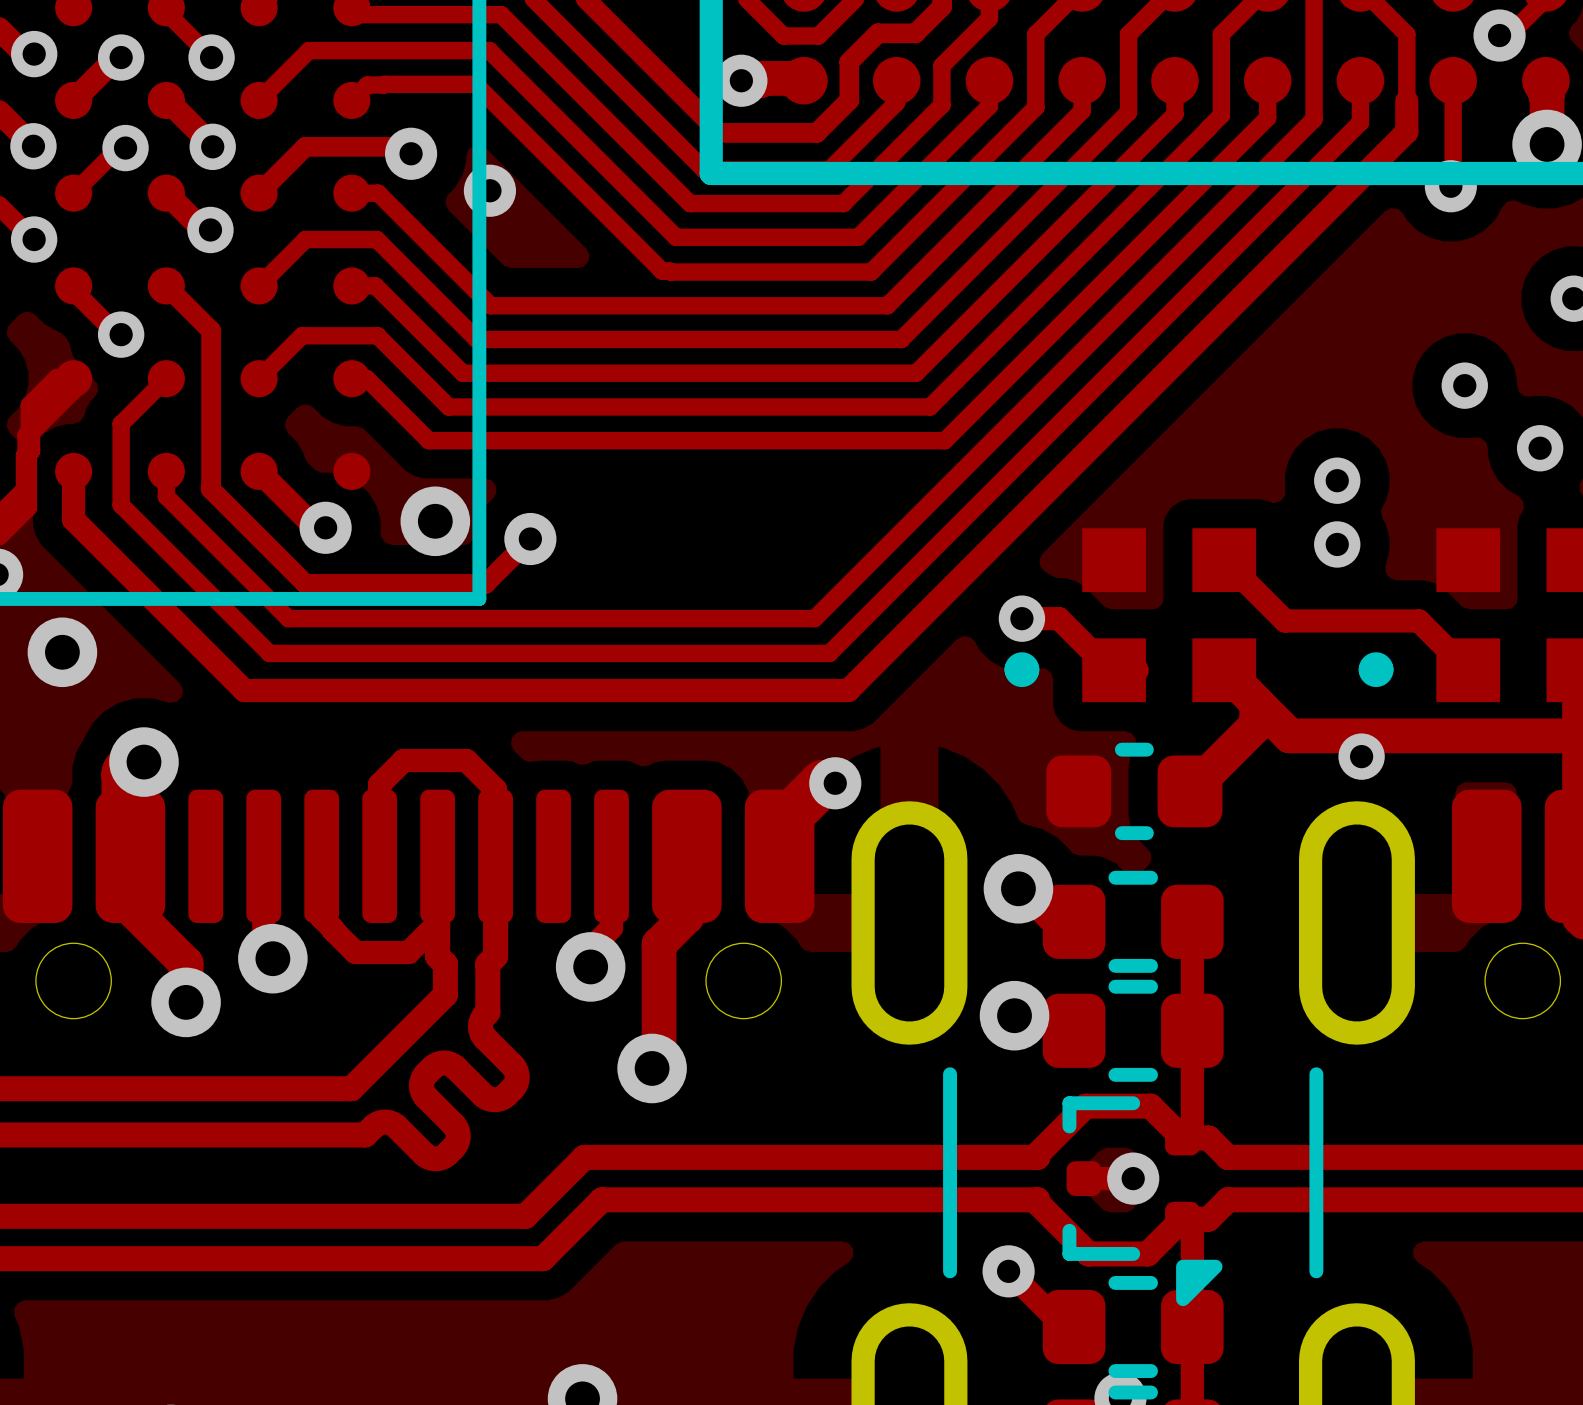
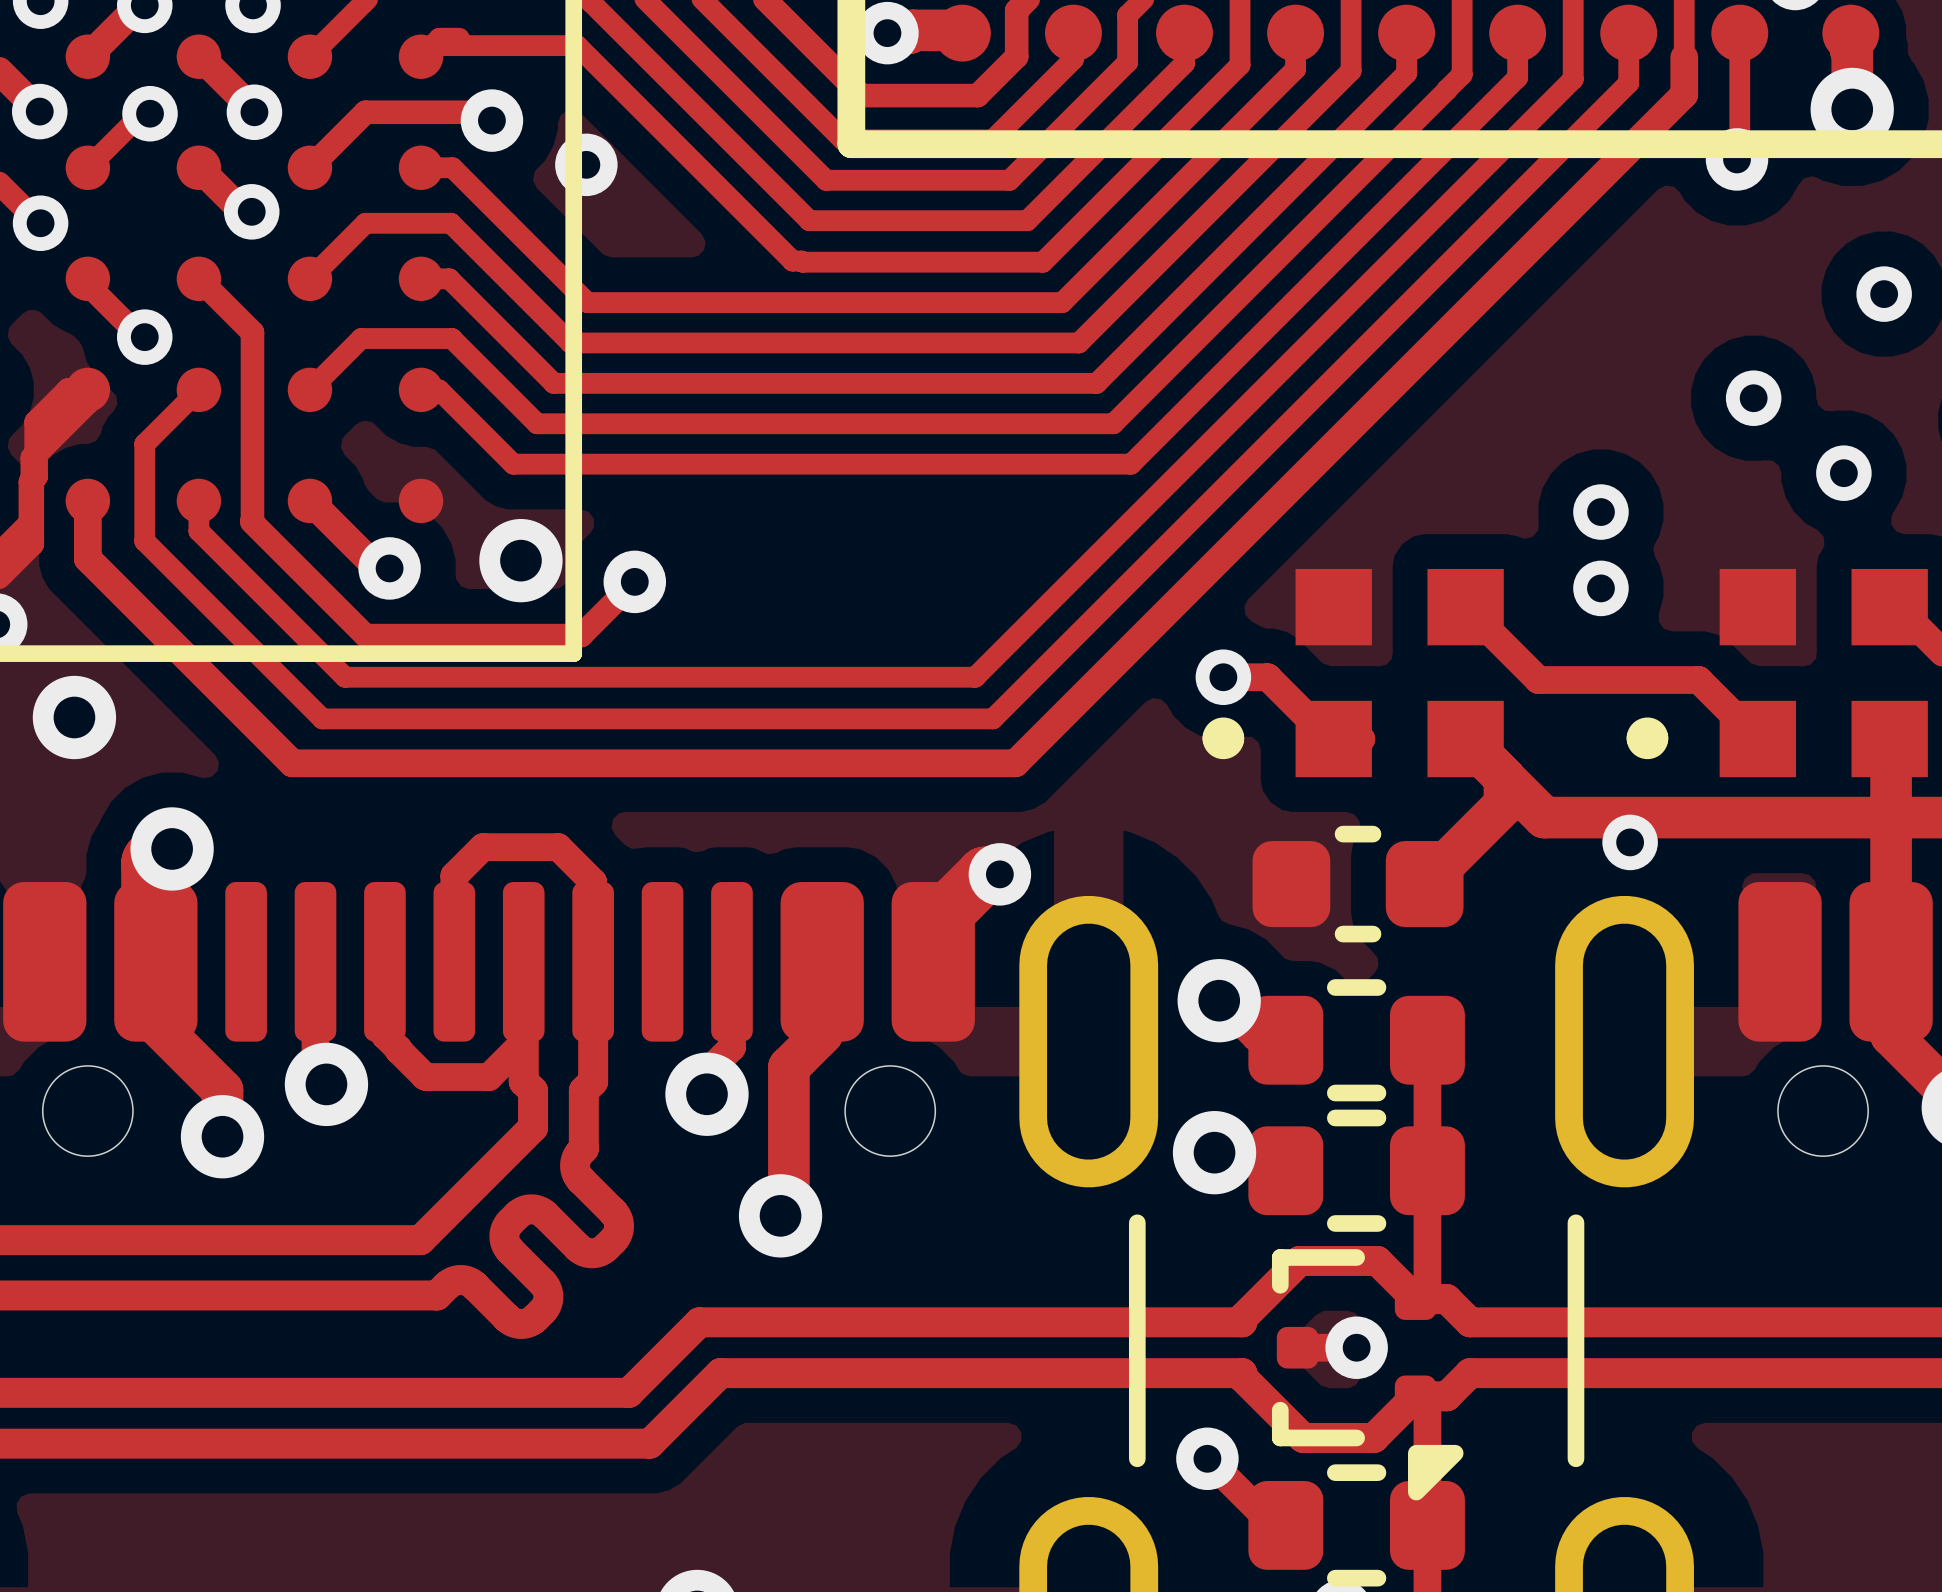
track: (384, 84) (475, 84) (482, 91) -> (432, 45) (577, 45)

